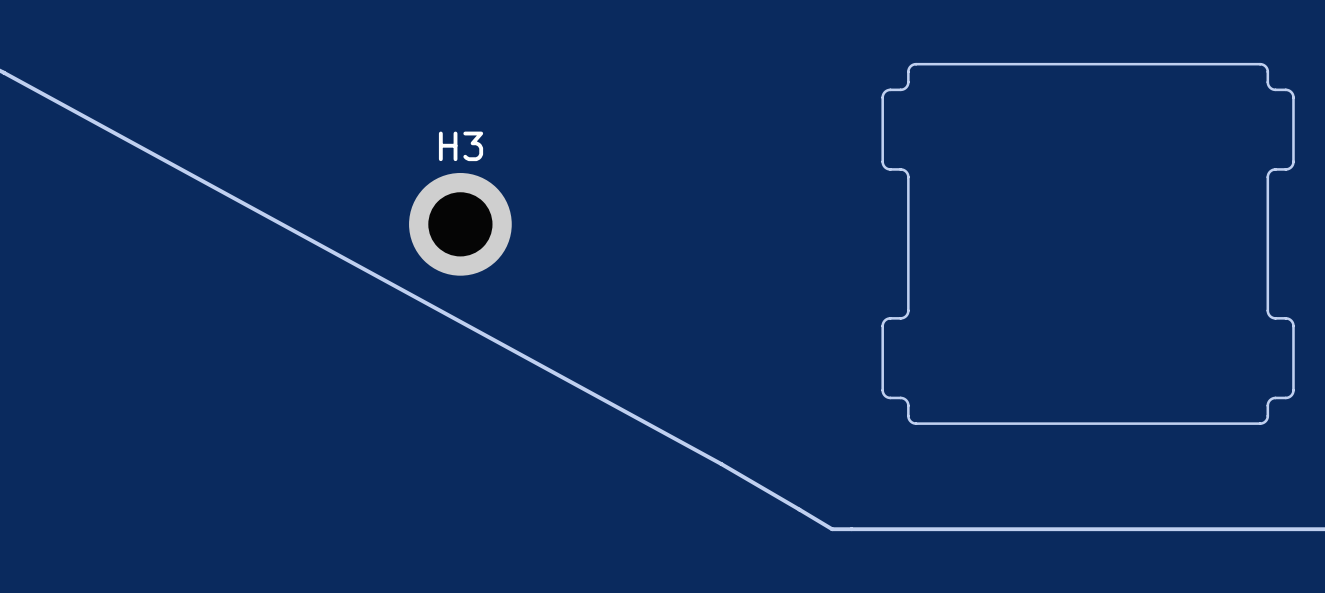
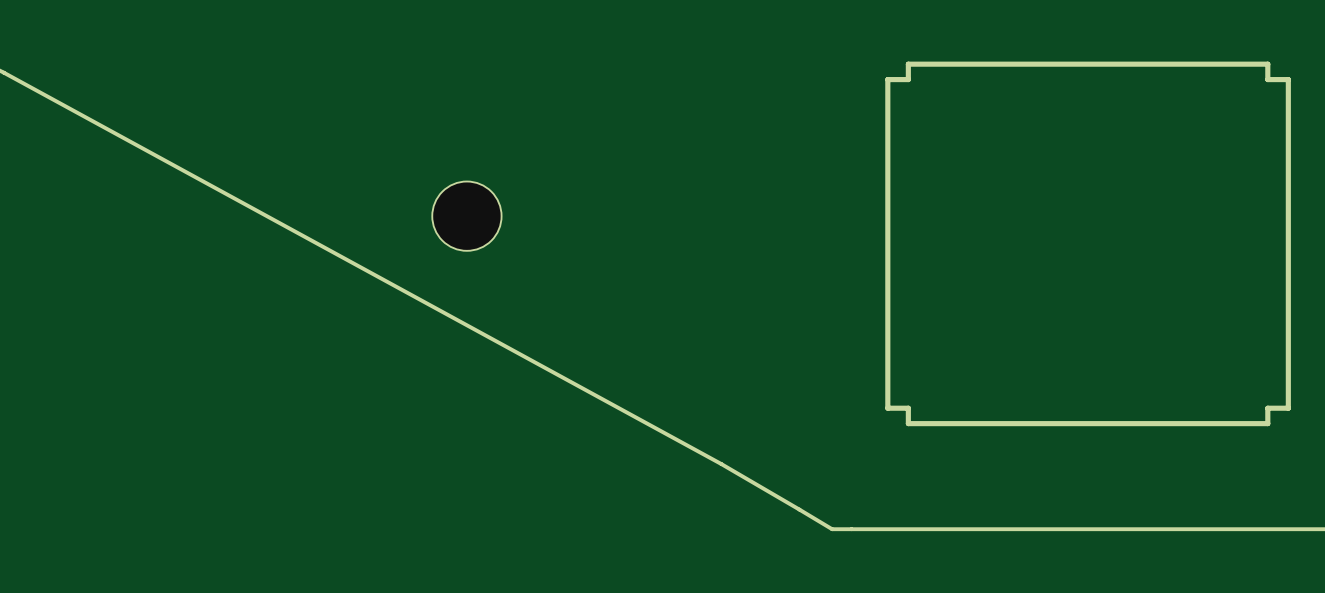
drawing shape: [881, 62, 1295, 425] -> [885, 61, 1291, 427]
part: none -> (466, 216)
H3: (460, 224) -> none

